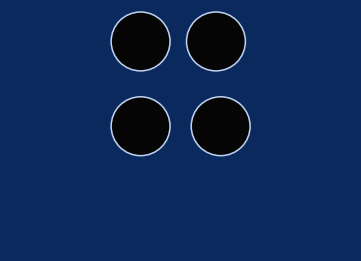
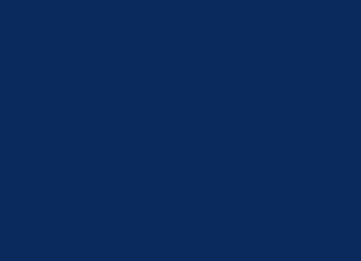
hole: (140, 41) -> none
hole: (215, 41) -> none
hole: (140, 126) -> none
hole: (220, 126) -> none

